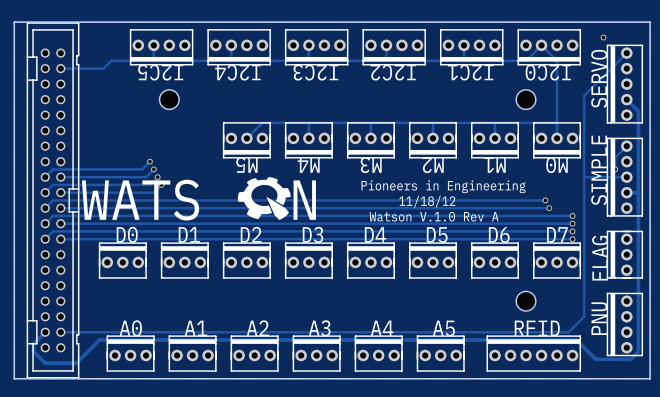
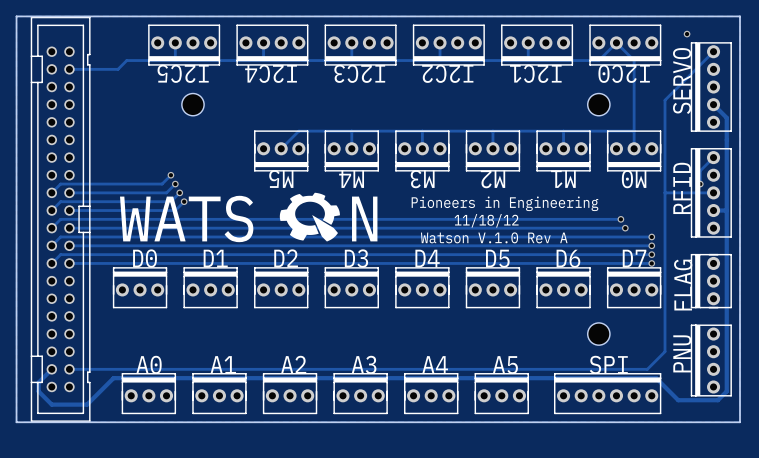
SIMPLE name: SIMPLE (599, 170) -> RFID (682, 188)
drawing: [237, 177, 291, 220] -> none
drawing: none -> [279, 192, 340, 242]
RFID name: RFID (537, 328) -> SPI (608, 364)

